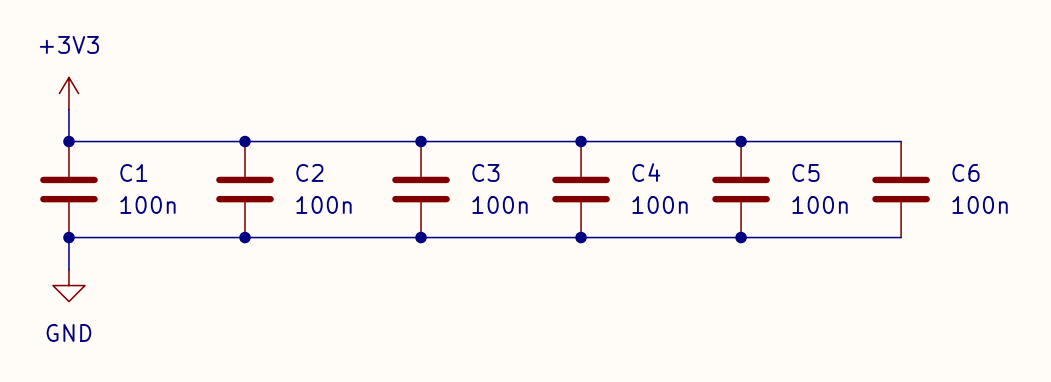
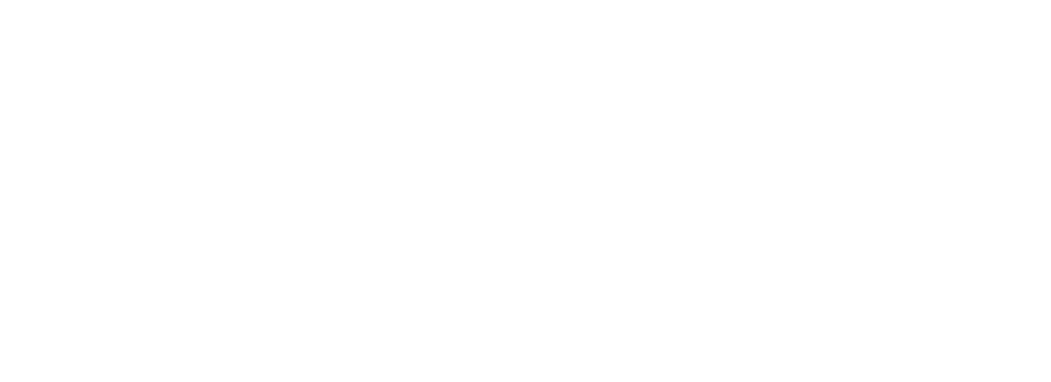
power symbol: +3V3 (68, 93) -> none
wire: (68, 109) (68, 141) (901, 141) -> none
junction: (68, 141) -> none
junction: (245, 141) -> none
junction: (421, 141) -> none
junction: (581, 141) -> none
junction: (741, 141) -> none
C1: 100n (68, 189) -> none
C2: 100n (245, 189) -> none
C3: 100n (421, 189) -> none
C4: 100n (581, 189) -> none
C5: 100n (741, 189) -> none
C6: 100n (901, 189) -> none
junction: (68, 237) -> none
junction: (245, 237) -> none
junction: (421, 237) -> none
junction: (581, 237) -> none
junction: (741, 237) -> none
wire: (901, 237) (68, 237) (68, 269) -> none
power symbol: GND (68, 285) -> none

